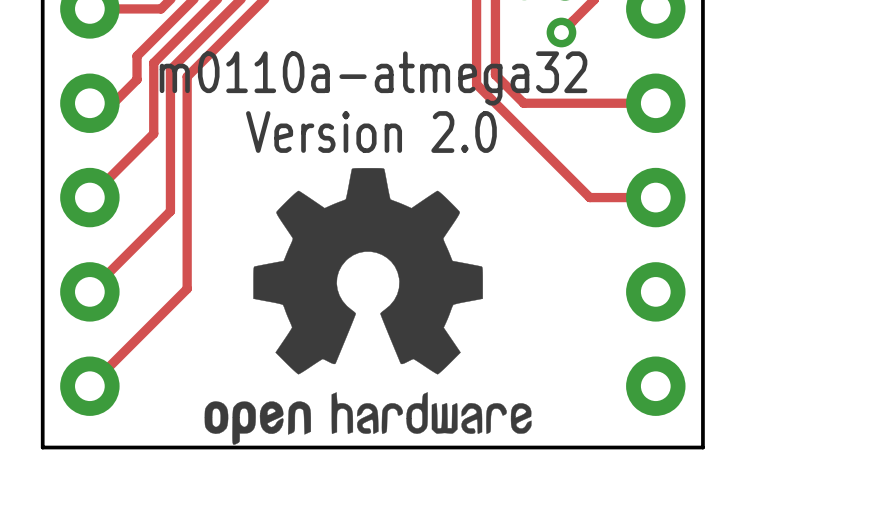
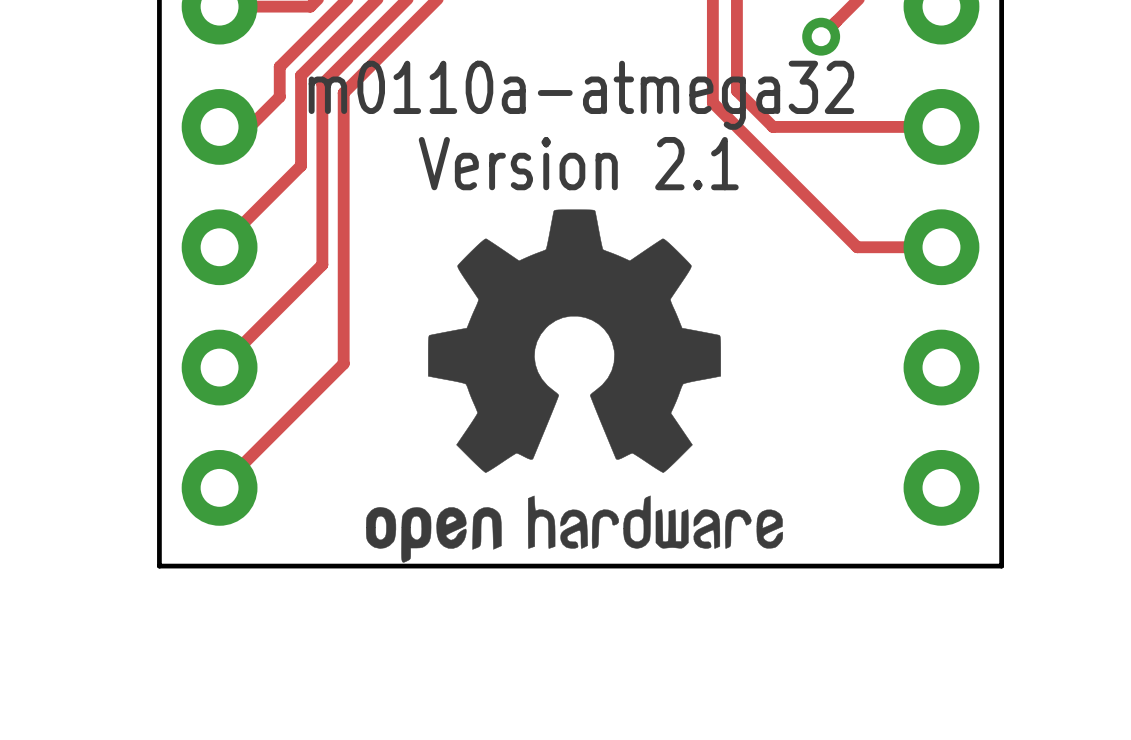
text: Version 2.0 (371, 132) -> Version 2.1 (578, 163)

